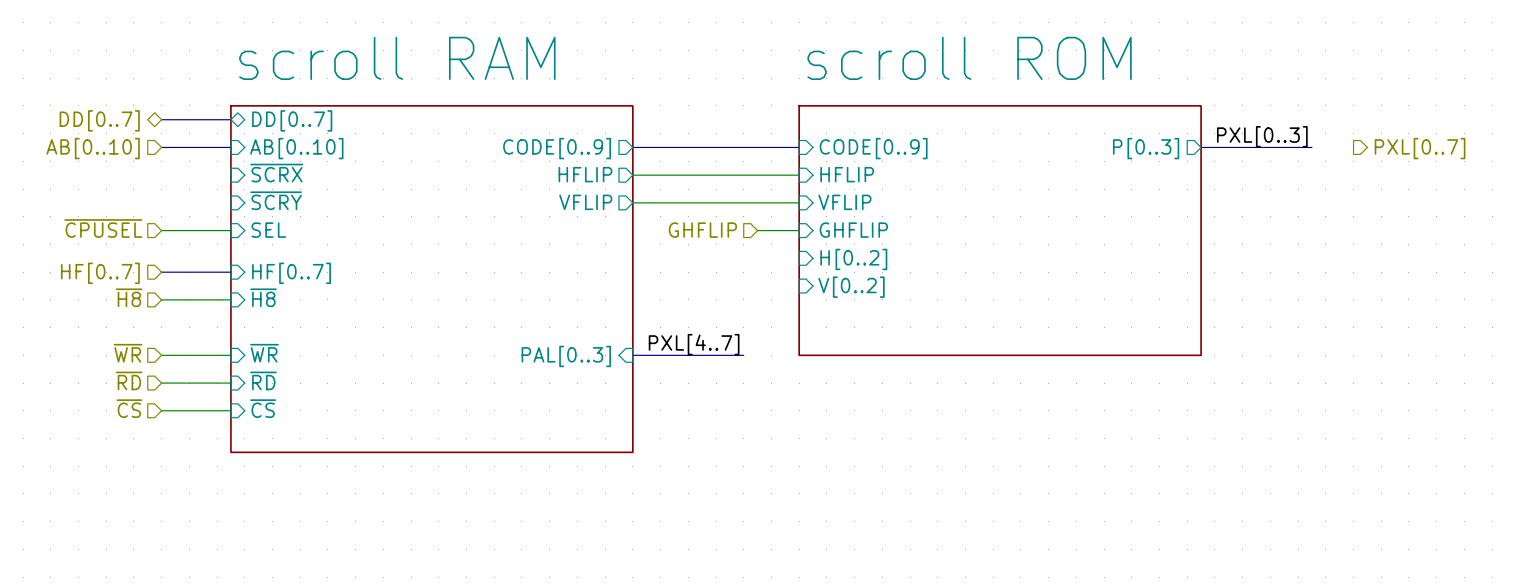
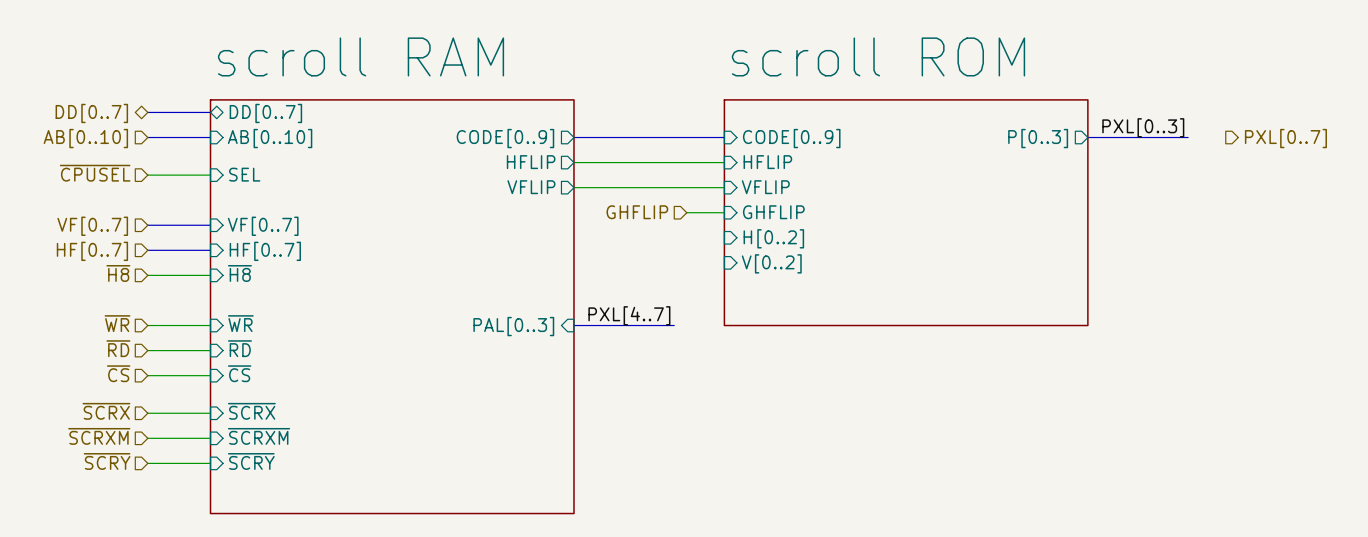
sheet pin: ~{SCRX} (276, 173) -> none
sheet pin: ~{SCRY} (276, 200) -> none
hierarchical label position: ~{CPUSEL} (103, 228) -> ~{CPUSEL} (95, 173)
wire: (161, 230) (230, 230) -> (147, 175) (210, 175)
sheet pin position: SEL (268, 230) -> SEL (244, 174)
bus: none -> (147, 225) (210, 225)
hierarchical label: none -> VF[0..7] (92, 226)
sheet pin: none -> VF[0..7] (263, 226)
sheet scroll RAM: (431, 279) -> none
sheet scroll RAM: none -> (392, 306)
hierarchical label: none -> ~{SCRX} (106, 411)
sheet pin: none -> ~{SCRX} (251, 411)
wire: none -> (147, 413) (210, 413)
hierarchical label: none -> ~{SCRXM} (99, 436)
sheet pin: none -> ~{SCRXM} (259, 436)
wire: none -> (147, 438) (210, 438)
hierarchical label: none -> ~{SCRY} (107, 461)
sheet pin: none -> ~{SCRY} (251, 461)
wire: none -> (147, 463) (210, 463)

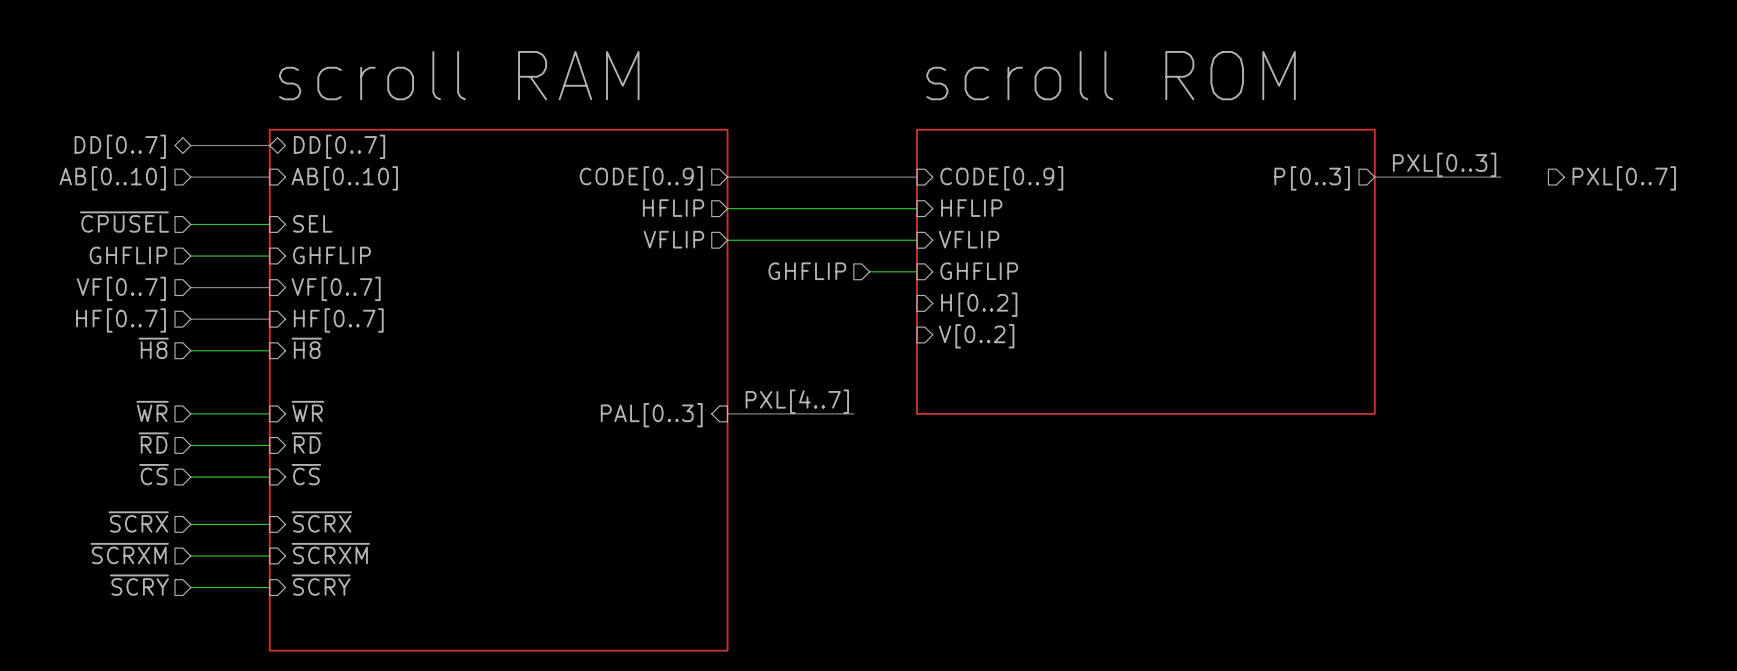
hierarchical label: none -> GHFLIP (128, 255)
sheet pin: none -> GHFLIP (331, 255)
wire: none -> (190, 256) (269, 256)

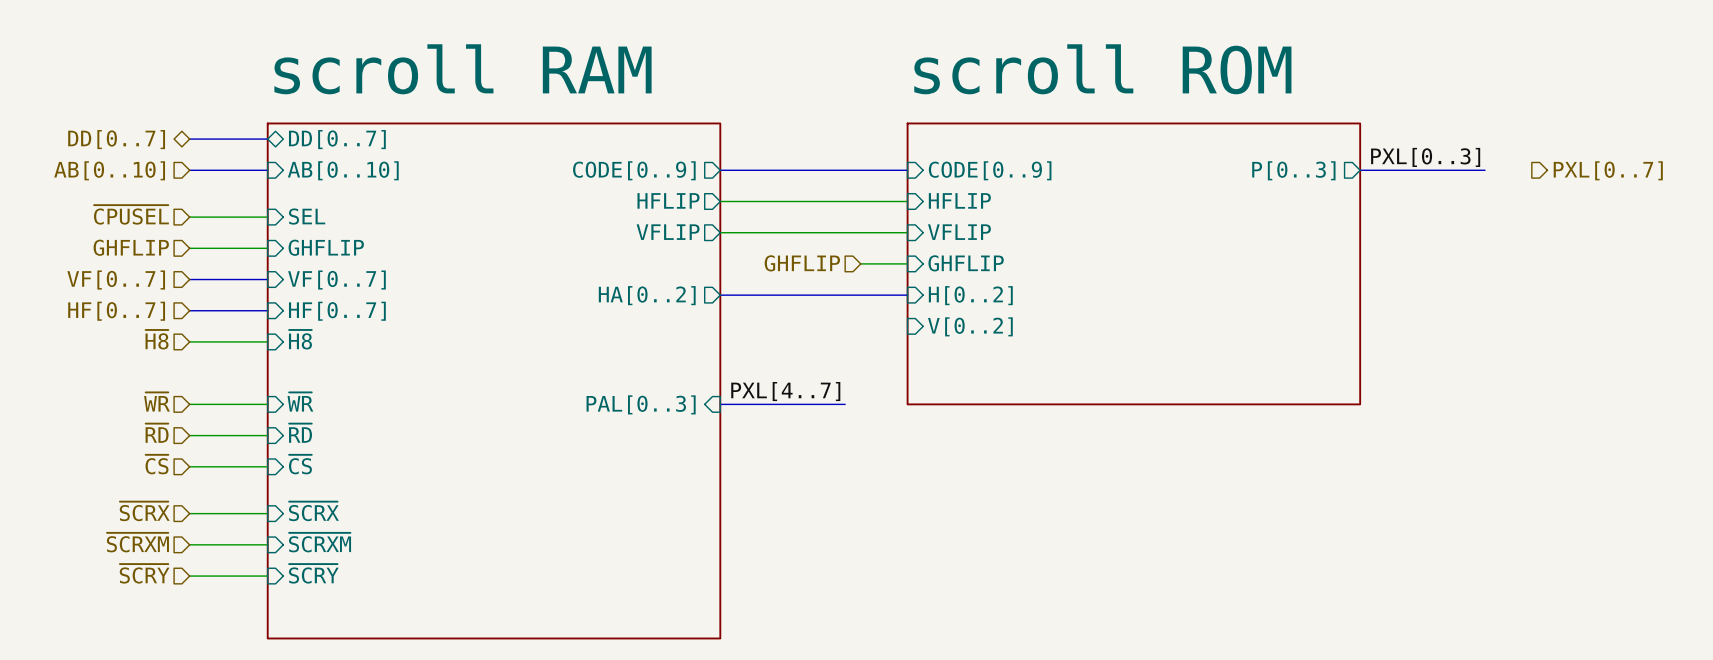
bus: none -> (720, 295) (907, 295)
sheet pin: none -> HA[0..2] (647, 295)

